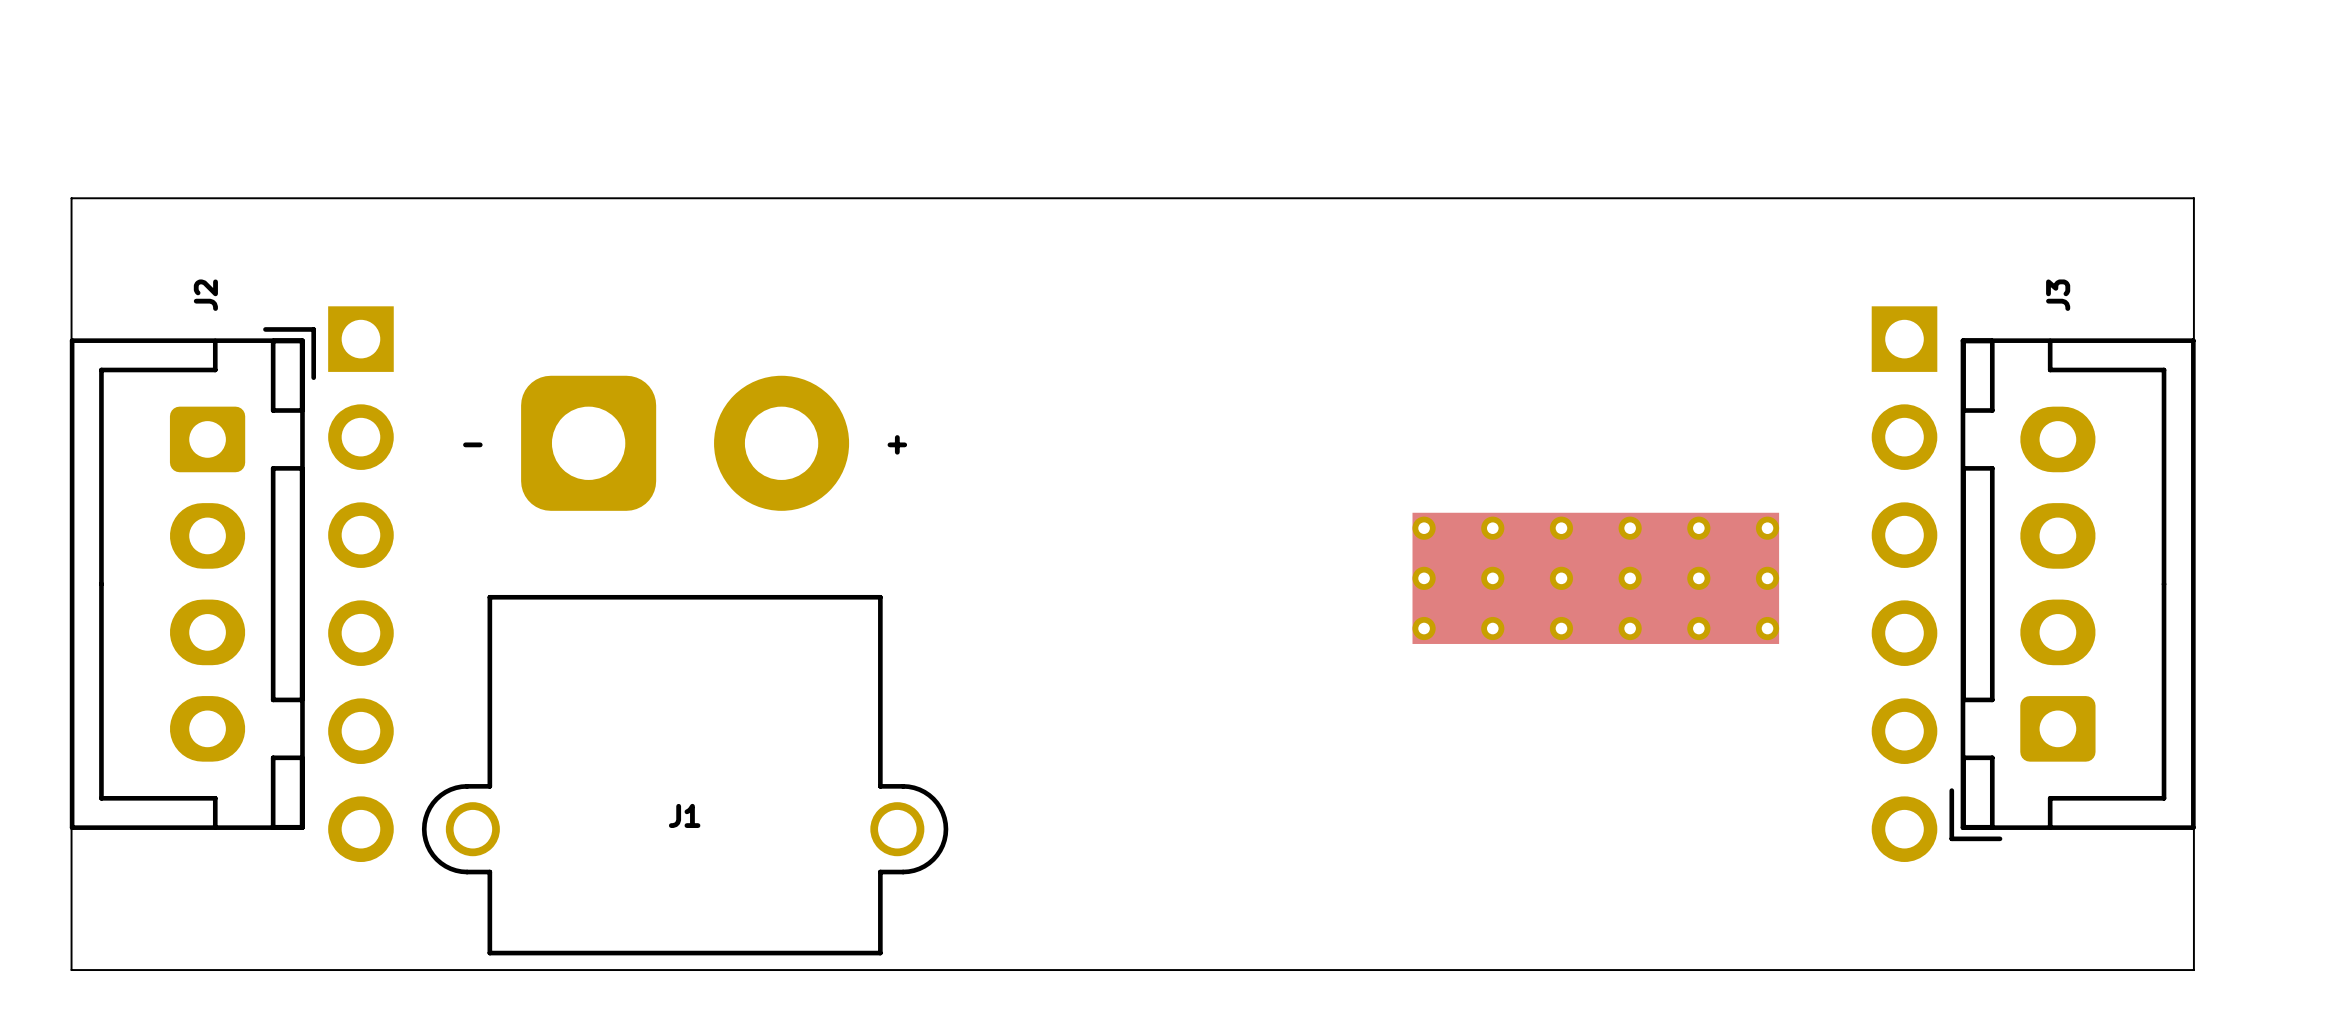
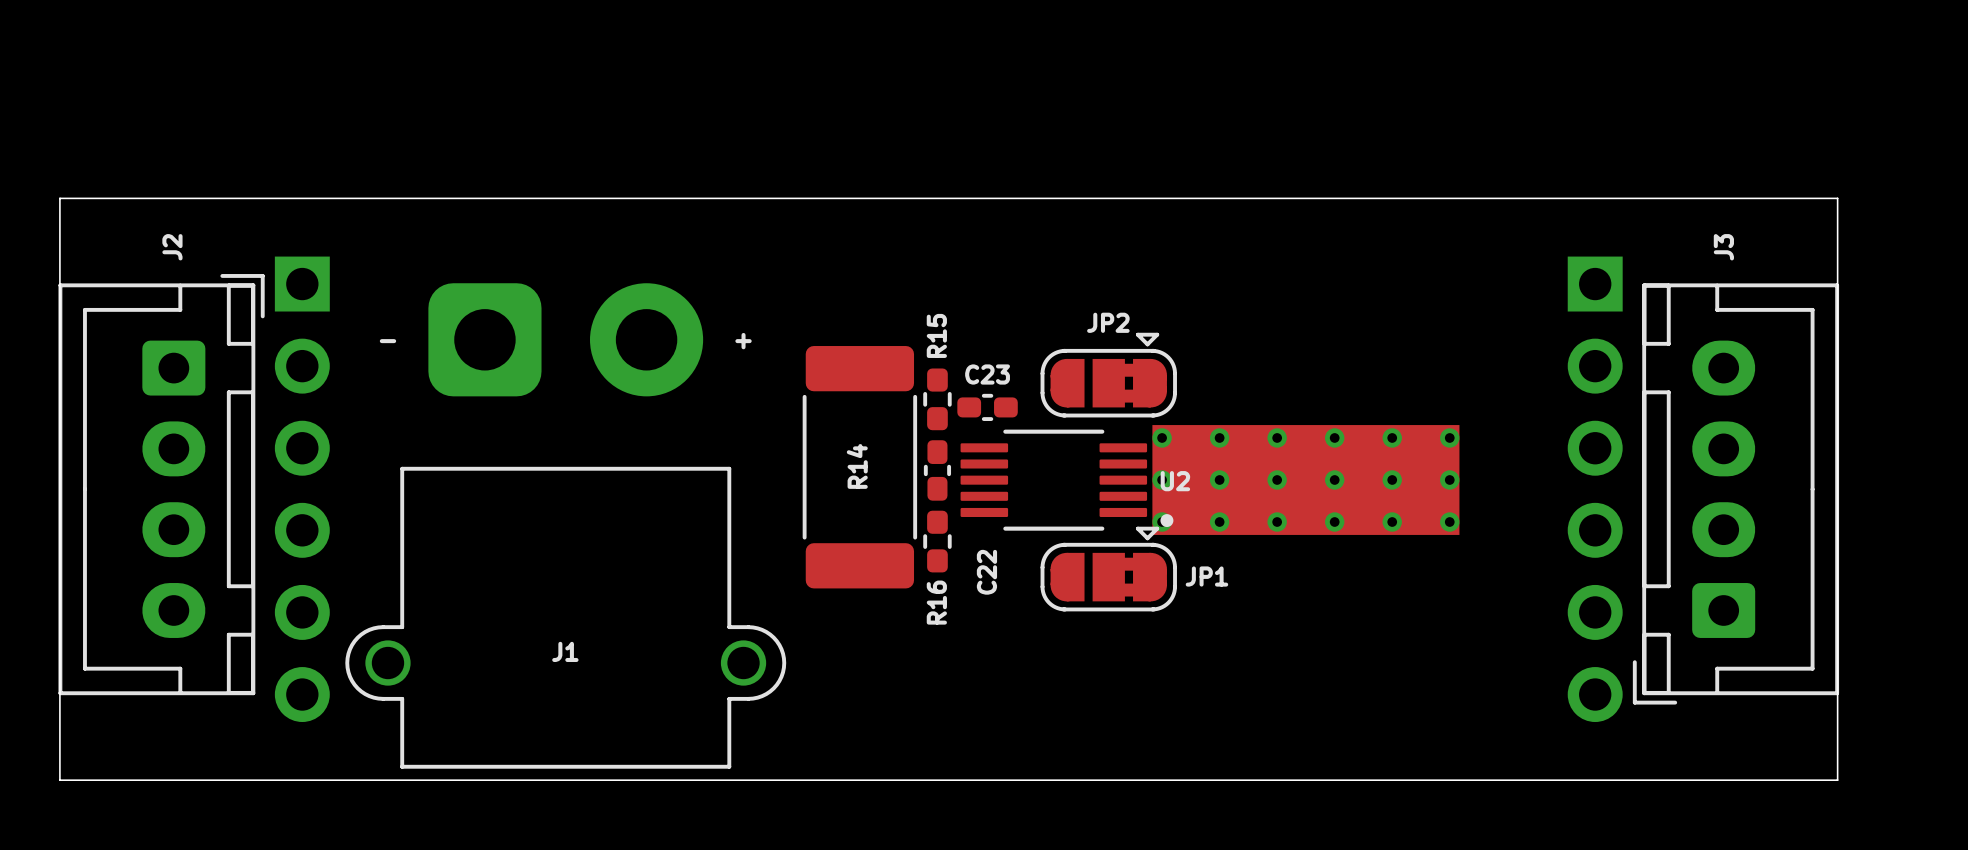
board edge: (71, 236) (71, 198) (2193, 198) (2193, 236) -> (59, 198) (1837, 198)
JP2: none -> (1108, 375)
R15: none -> (937, 399)
C23: none -> (987, 407)
R14: none -> (859, 467)
C22: none -> (937, 470)
U2: none -> (1066, 480)
part position: (1595, 578) -> (1305, 479)
R16: none -> (937, 541)
J1 position: (685, 665) -> (565, 525)
JP1: none -> (1108, 569)
board edge: (71, 931) (71, 970) (2193, 970) (2193, 931) -> (59, 780) (1837, 780)

